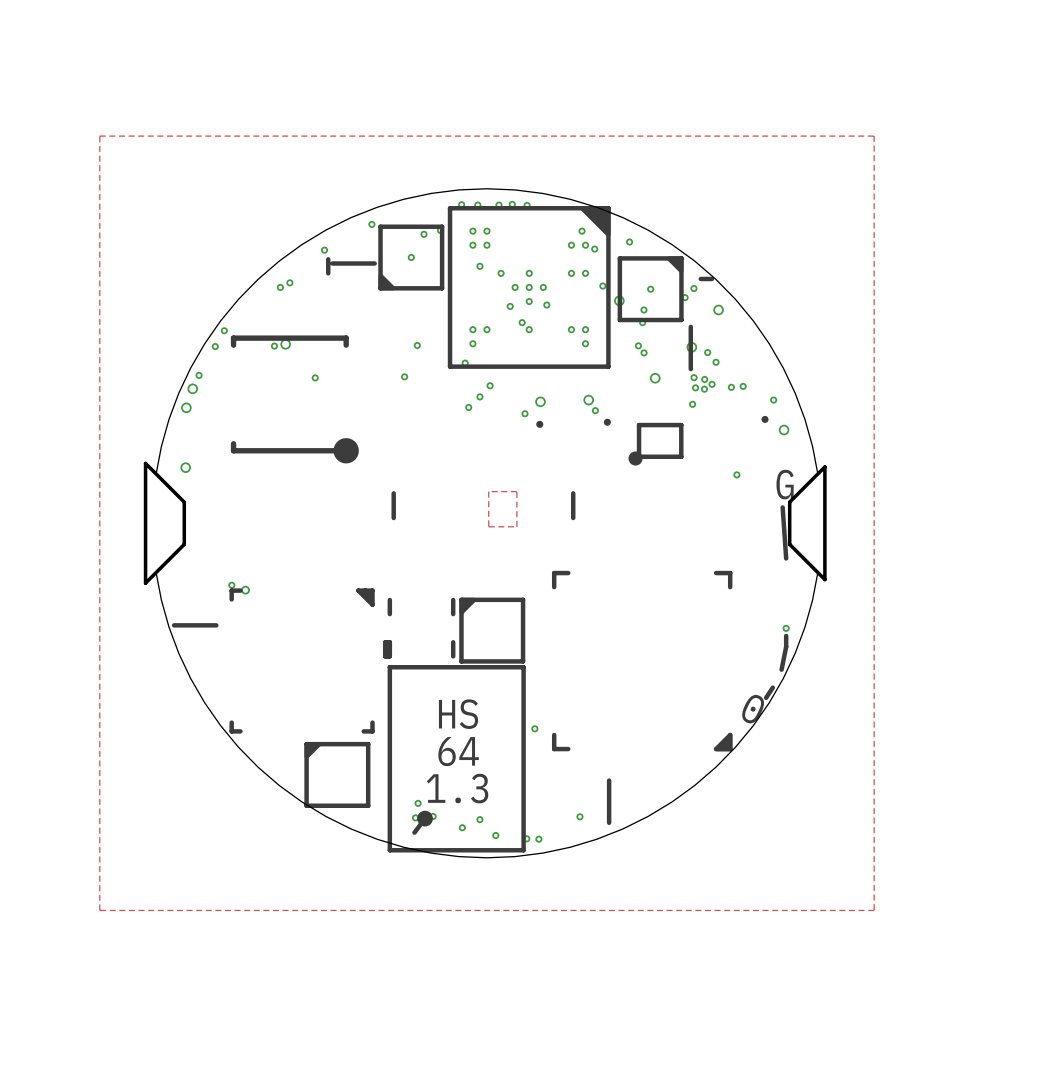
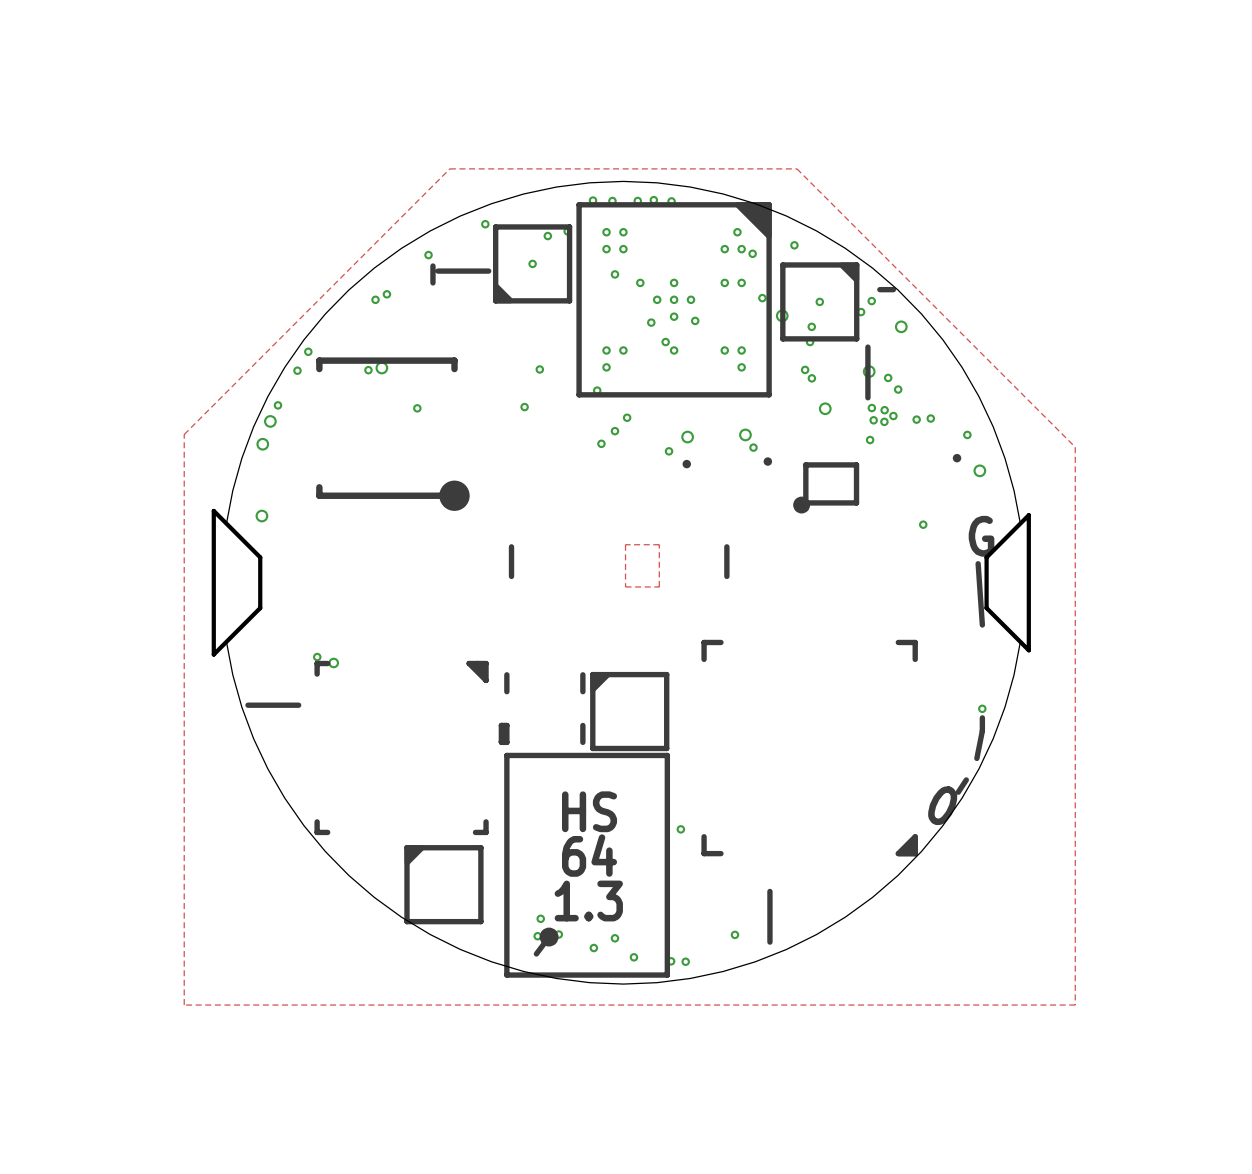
zone outline: (99, 136) (99, 910) (874, 910) (874, 136) (99, 136) -> (449, 168) (184, 434) (184, 1005) (1075, 1005) (1075, 447) (796, 168) (449, 168)

